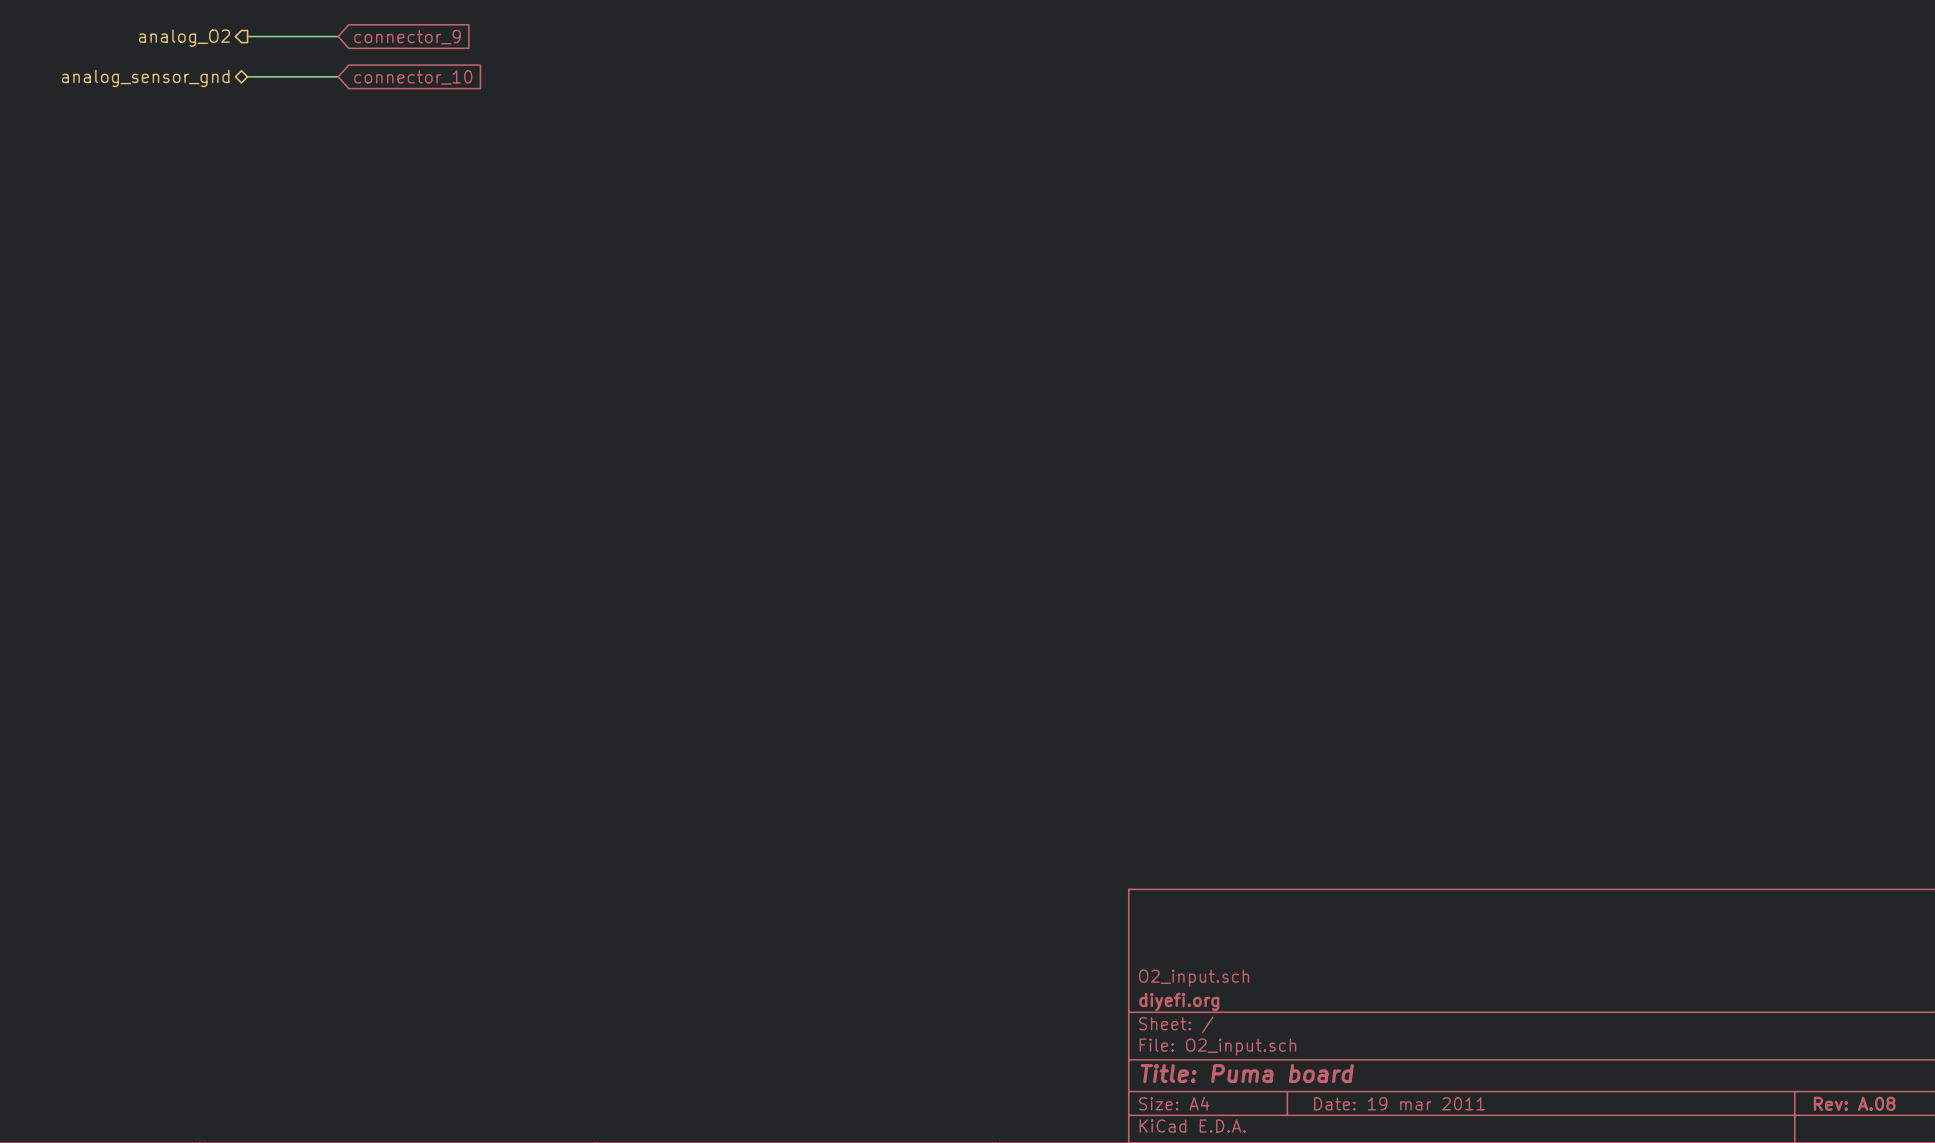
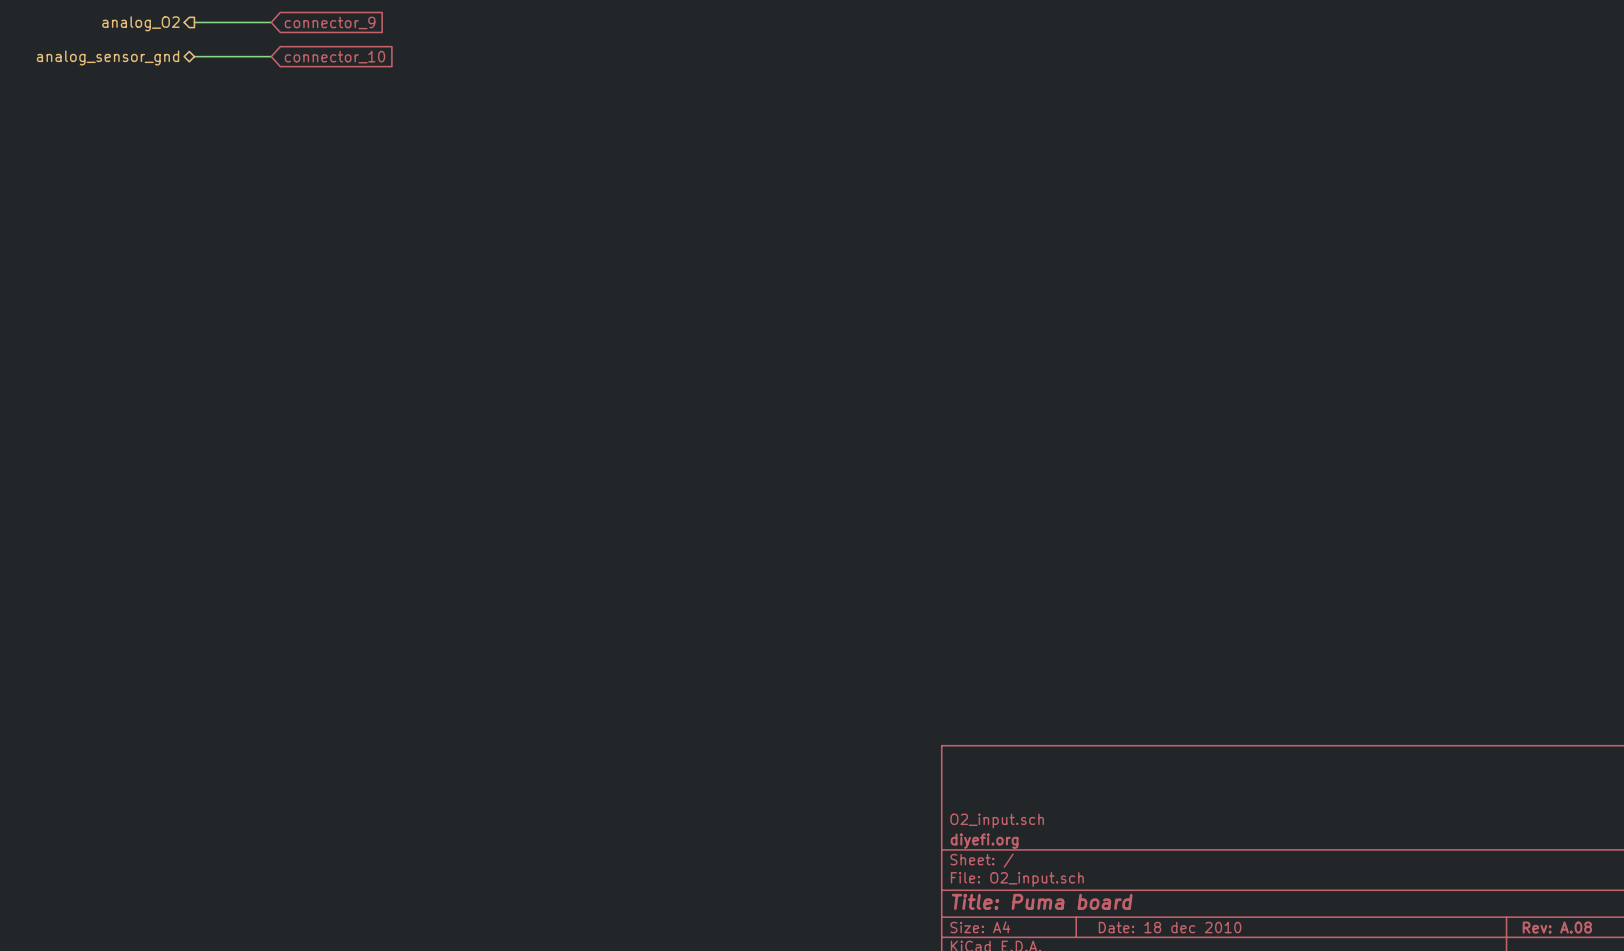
title block: Date: 19 mar 2011 (1399, 1103) -> Date: 18 dec 2010 (1170, 927)

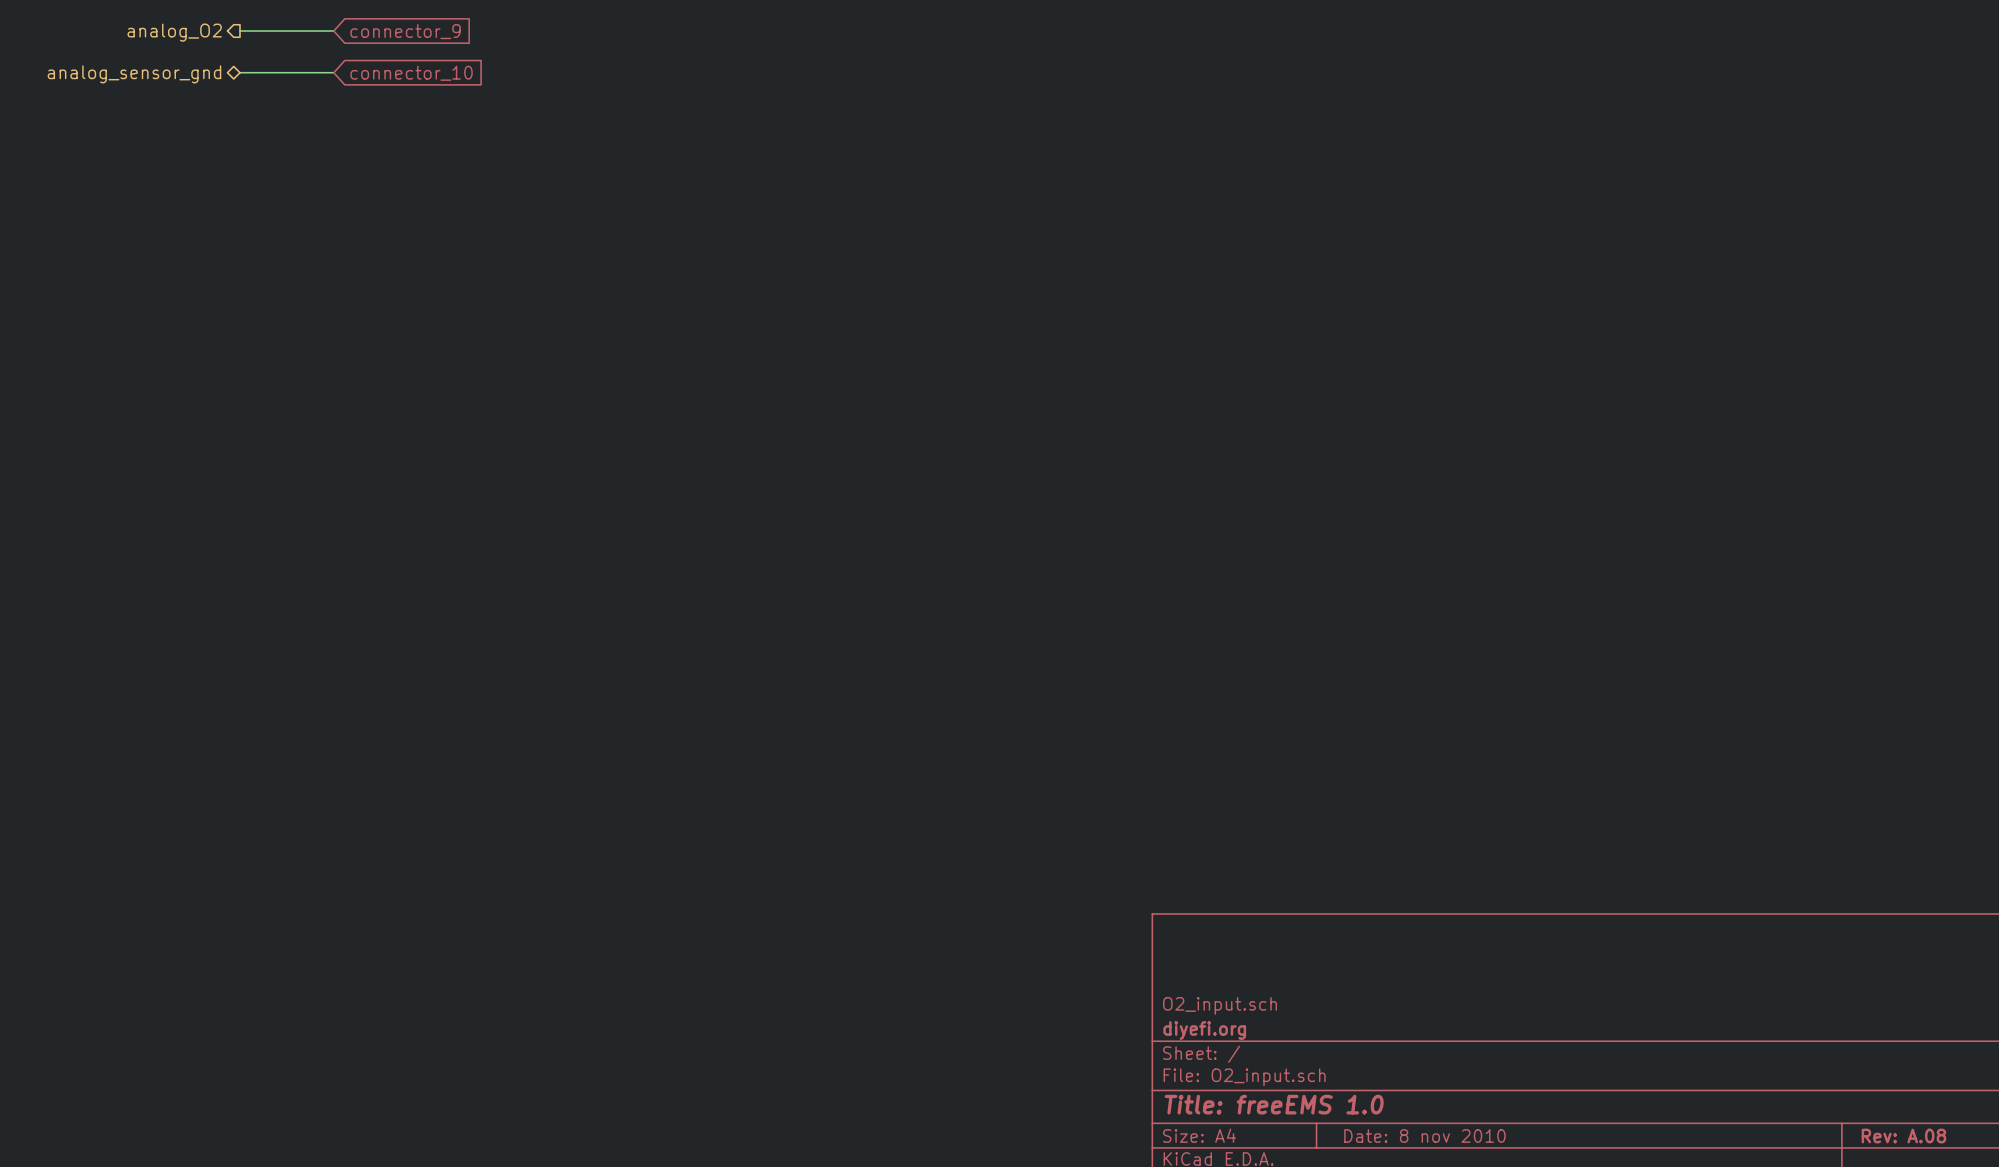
title block: Title: Puma board (1042, 901) -> Title: freeEMS 1.0 (1274, 1104)
title block: Date: 18 dec 2010 (1170, 927) -> Date: 8 nov 2010 (1424, 1136)

